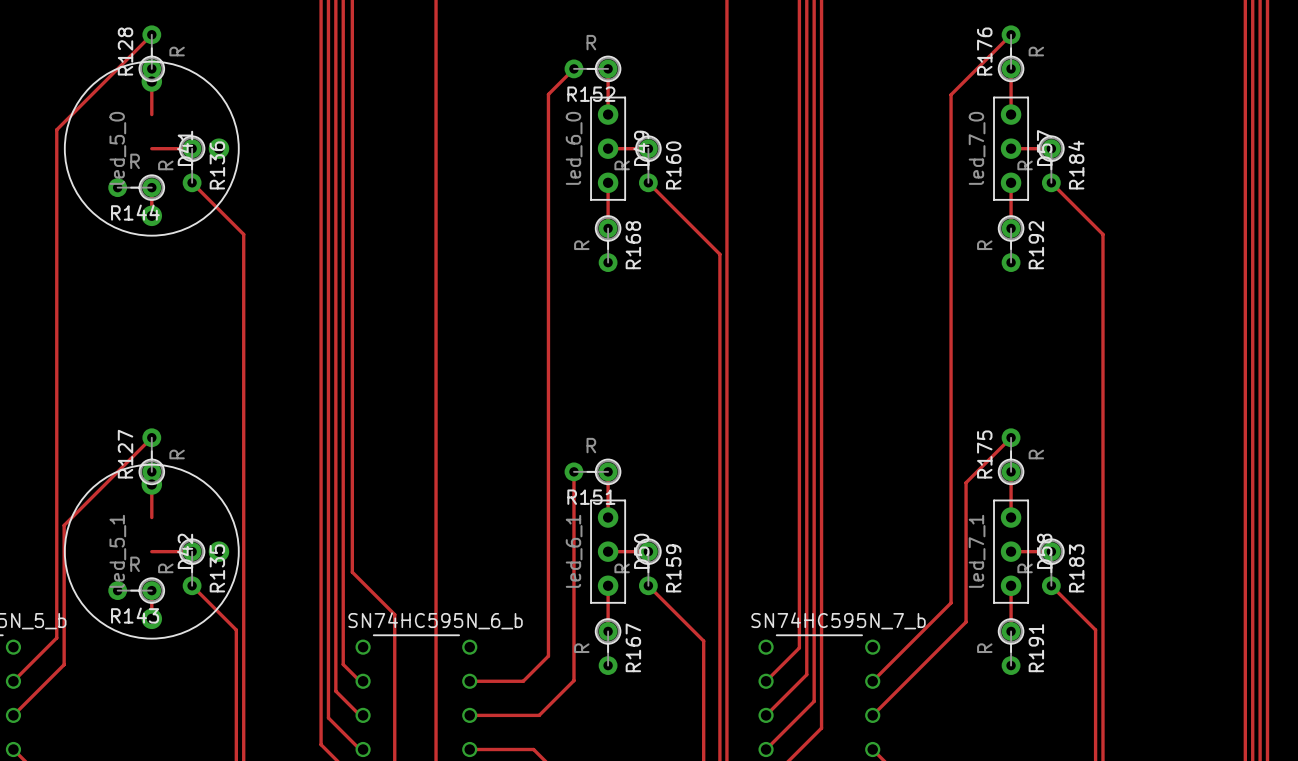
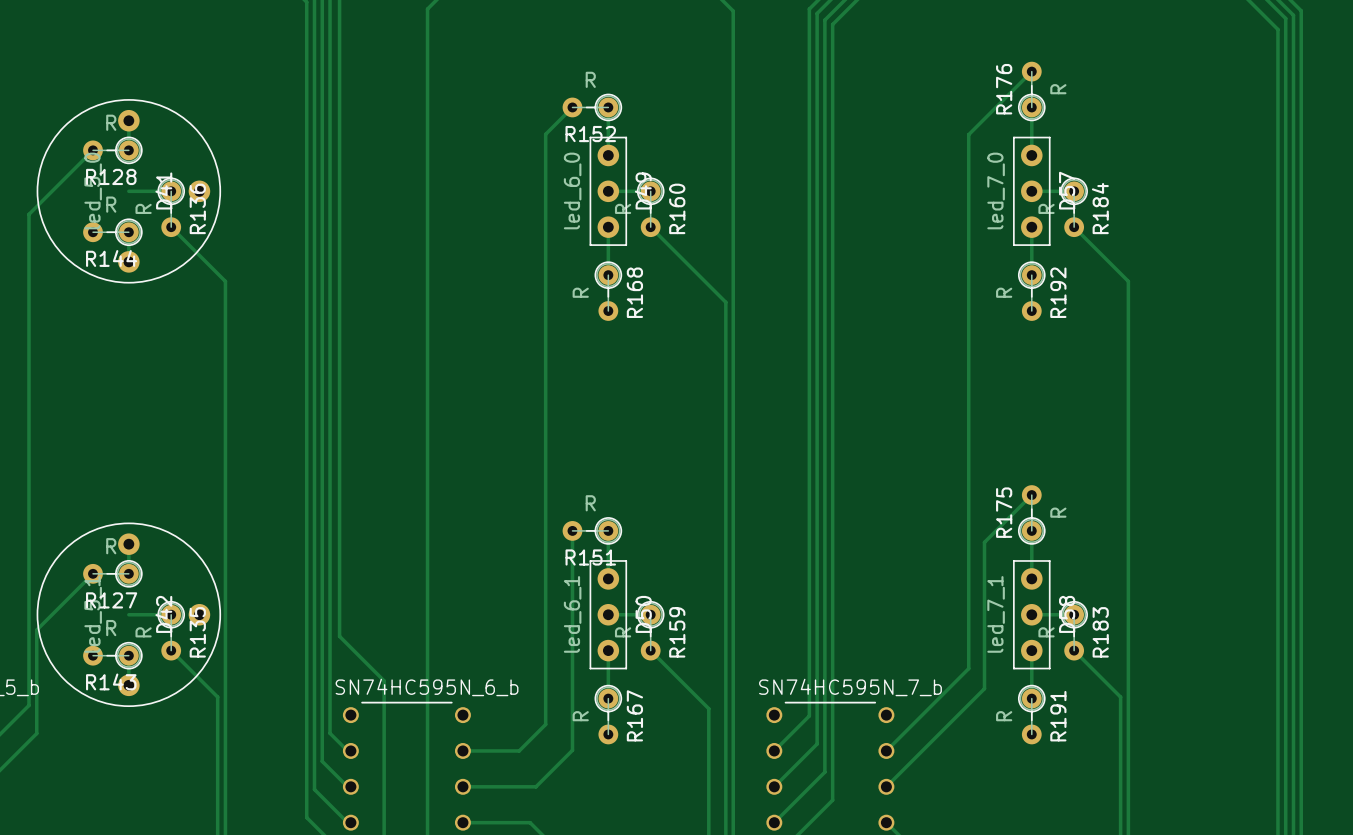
track: (151, 34) (56, 129) (56, 170) -> (93, 150) (28, 214)
R128 rotation: 0° (151, 53) -> 90° counterclockwise (112, 150)
R128 position: (151, 53) -> (112, 150)
track: (151, 437) (64, 525) (64, 566) -> (93, 573) (36, 630)
R127 rotation: 0° (151, 456) -> 90° counterclockwise (112, 573)
R127 position: (151, 456) -> (112, 573)

